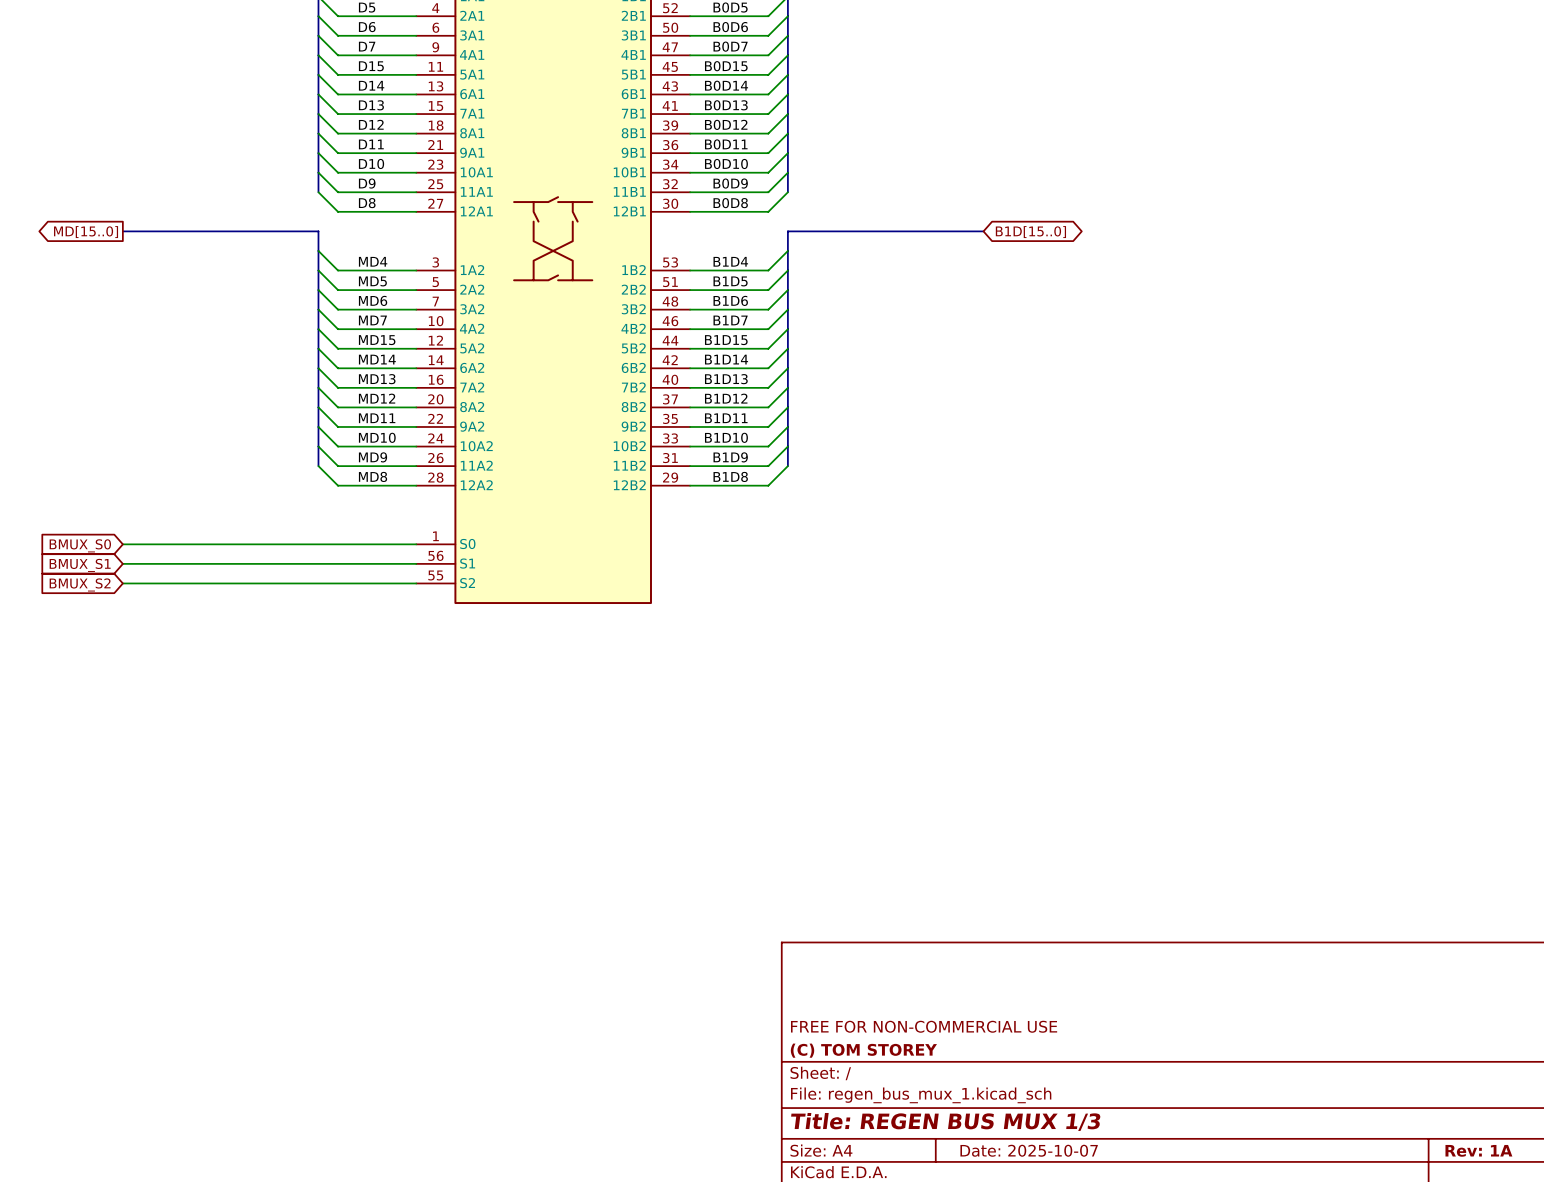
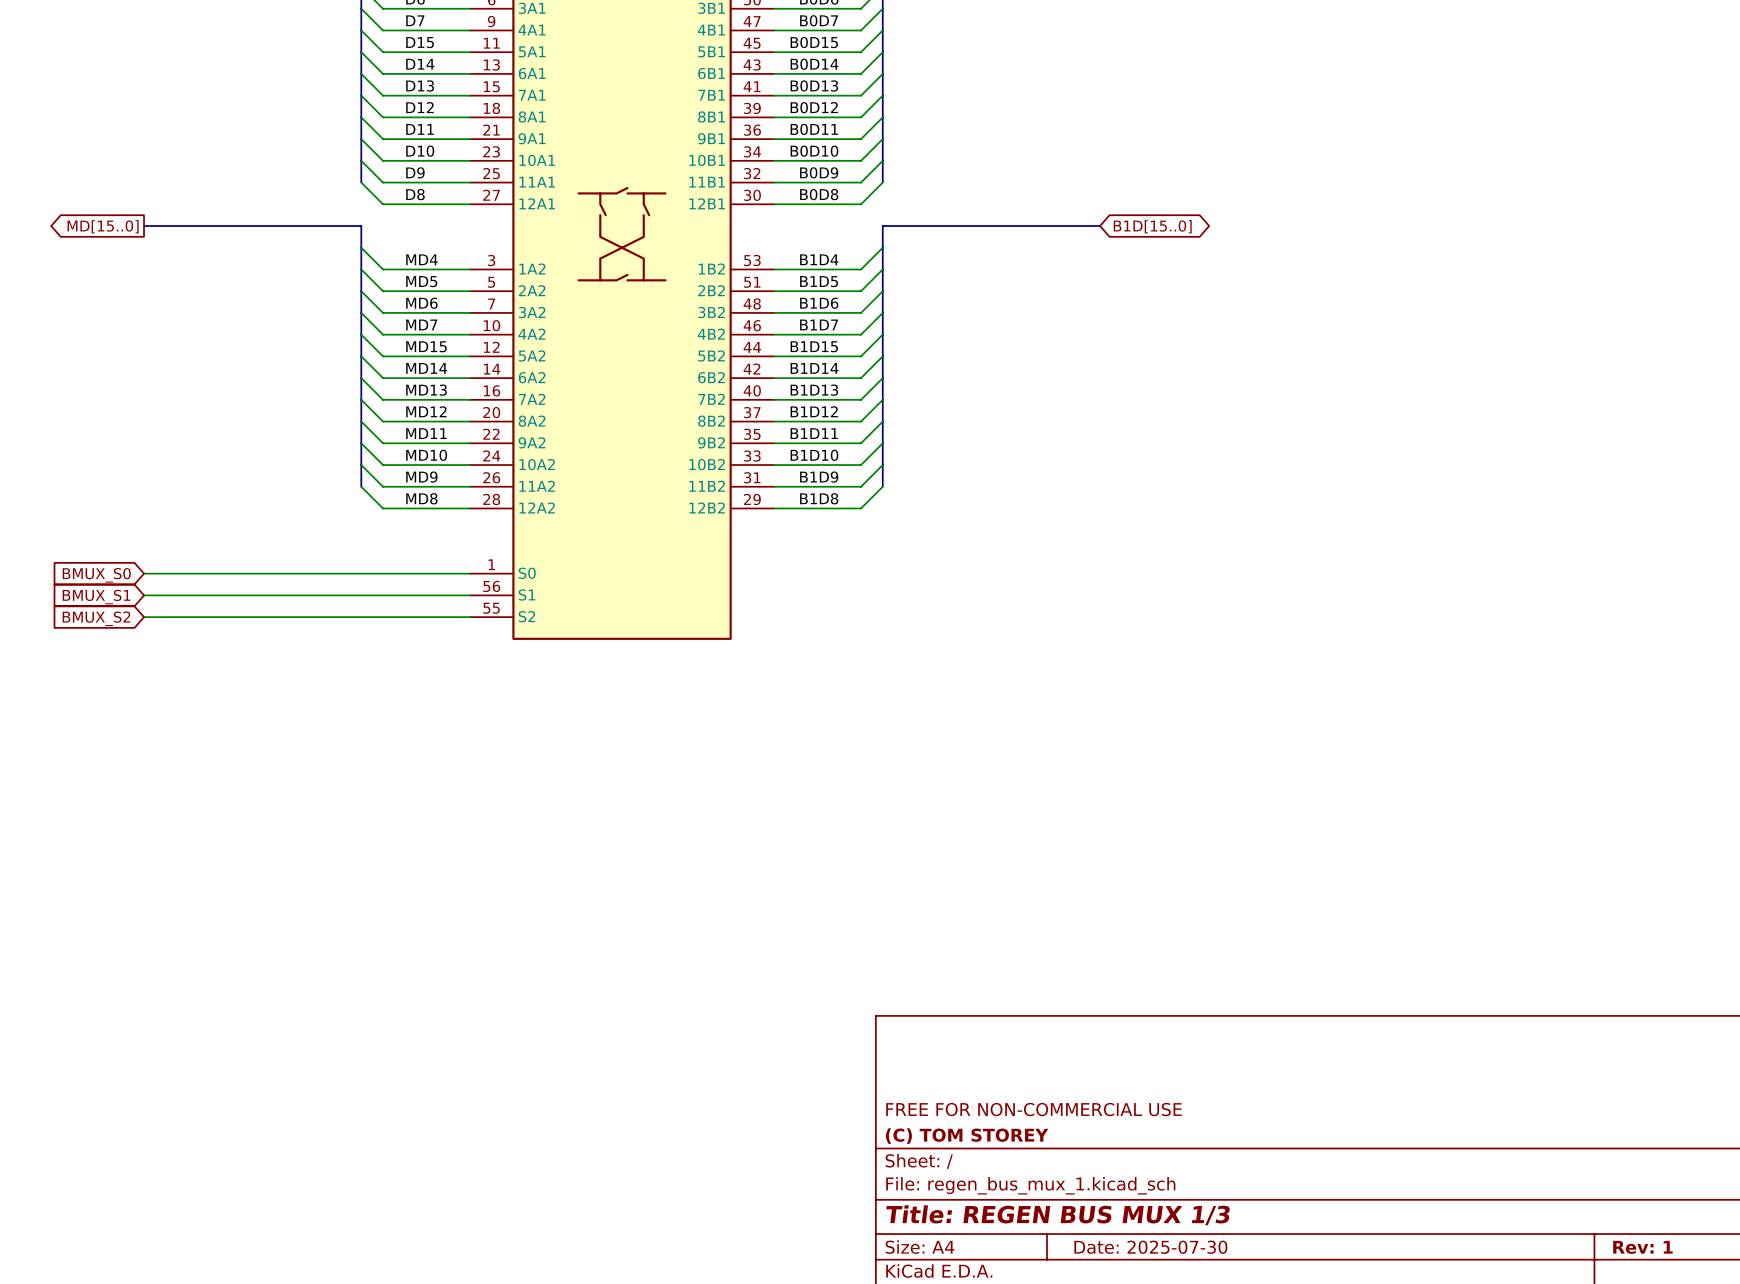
title block: Date: 2025-10-07 (1029, 1150) -> Date: 2025-07-30 (1150, 1247)
title block: Rev: 1A (1478, 1150) -> Rev: 1 (1642, 1247)

